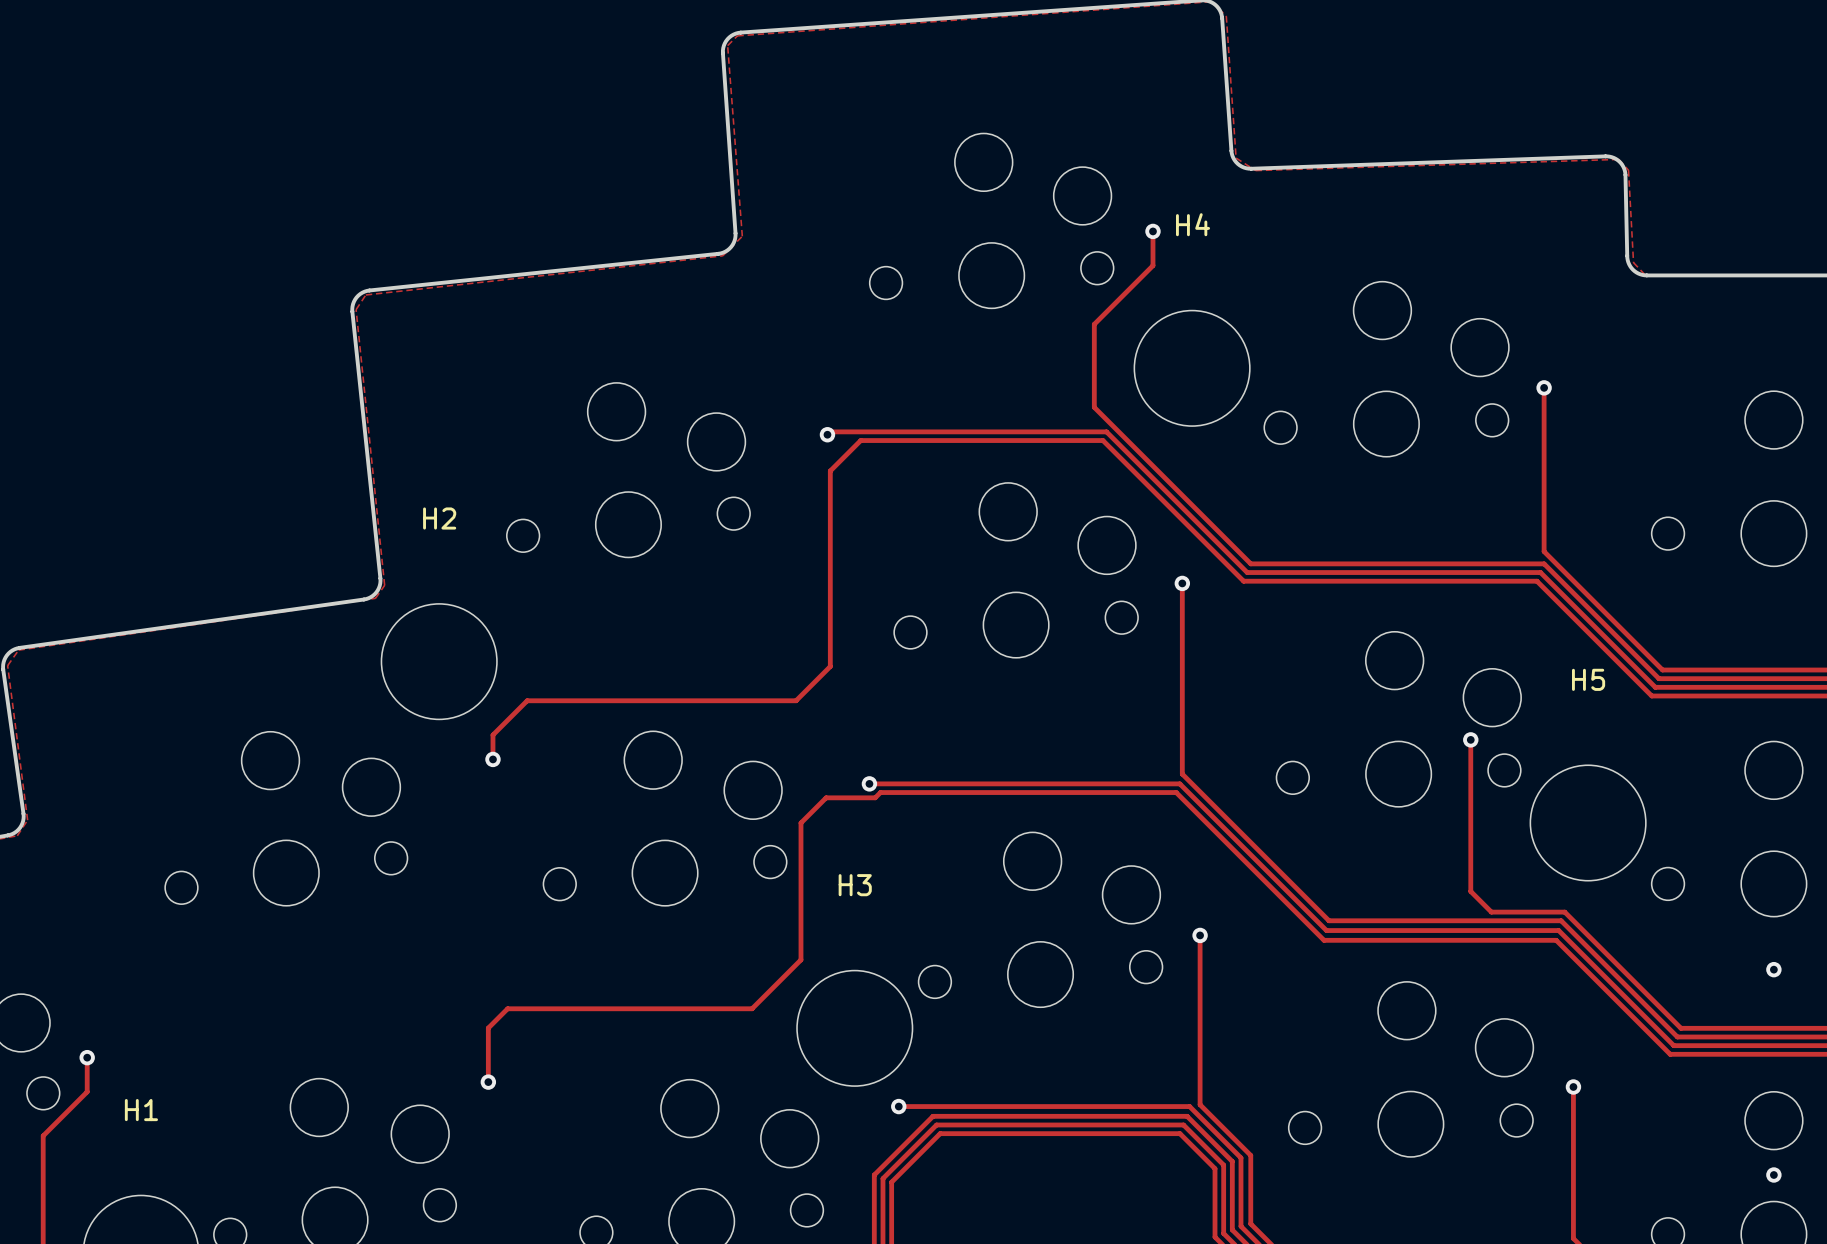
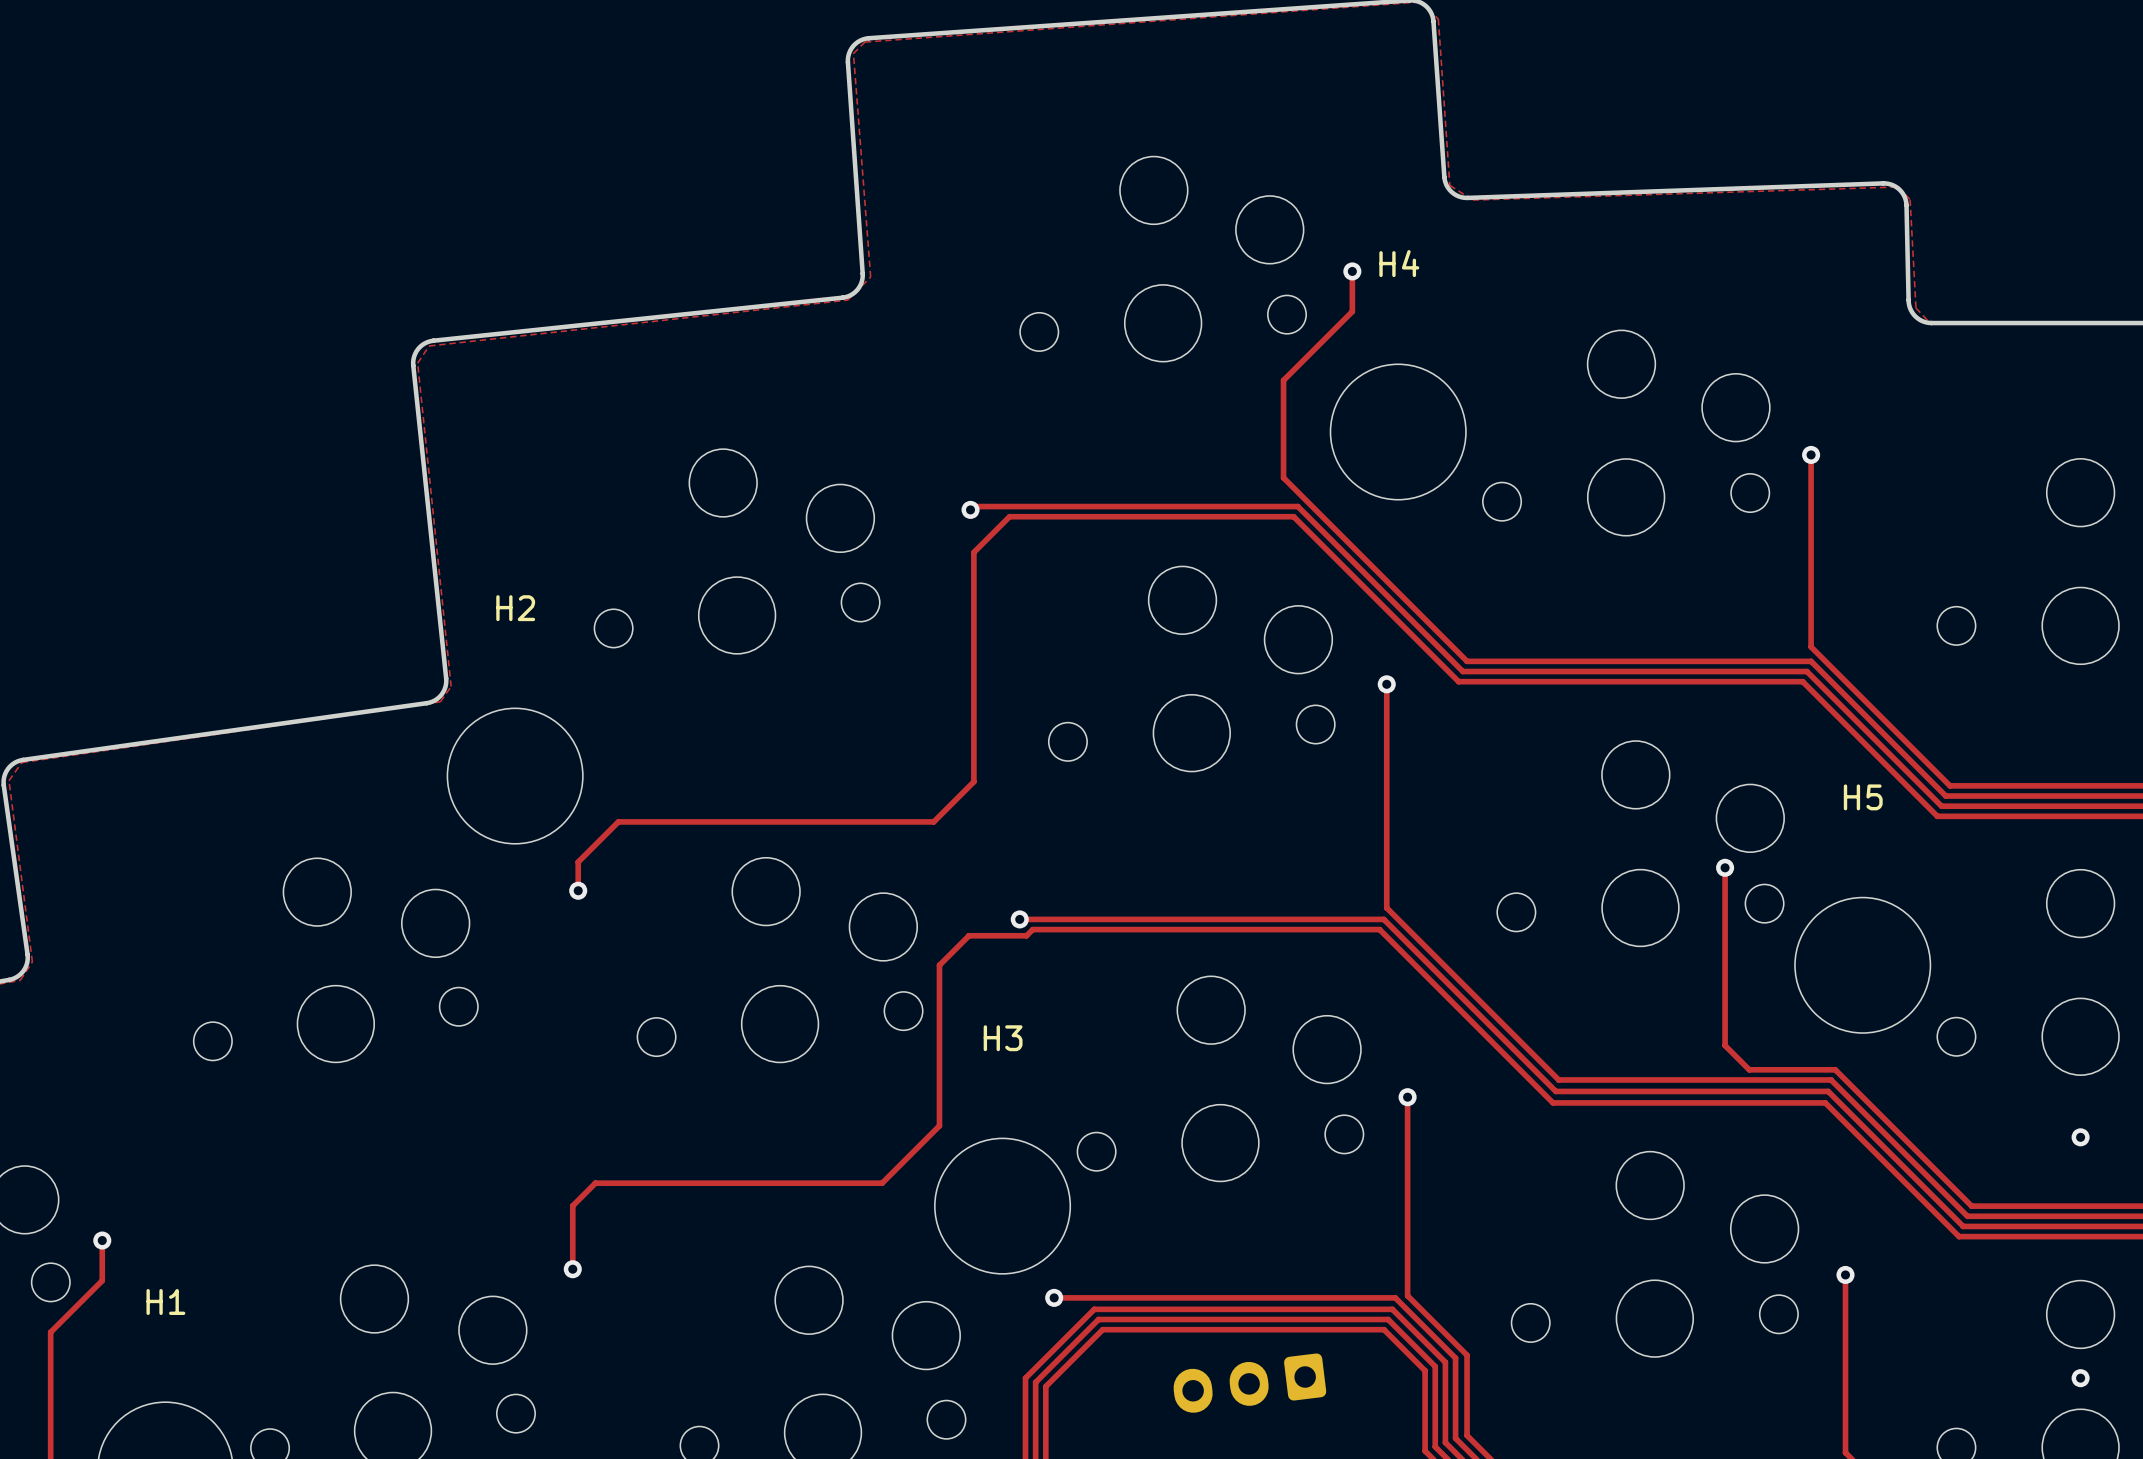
part: none -> (1249, 1383)

